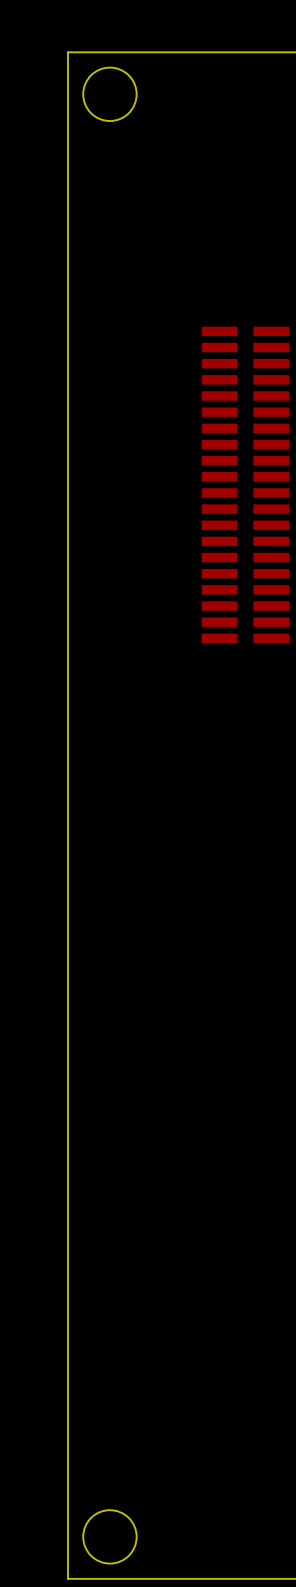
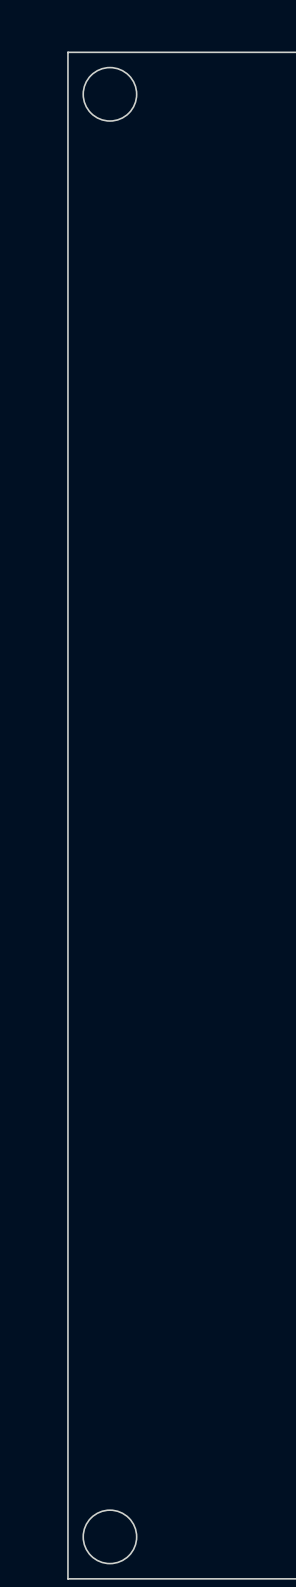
part: (245, 484) -> none

